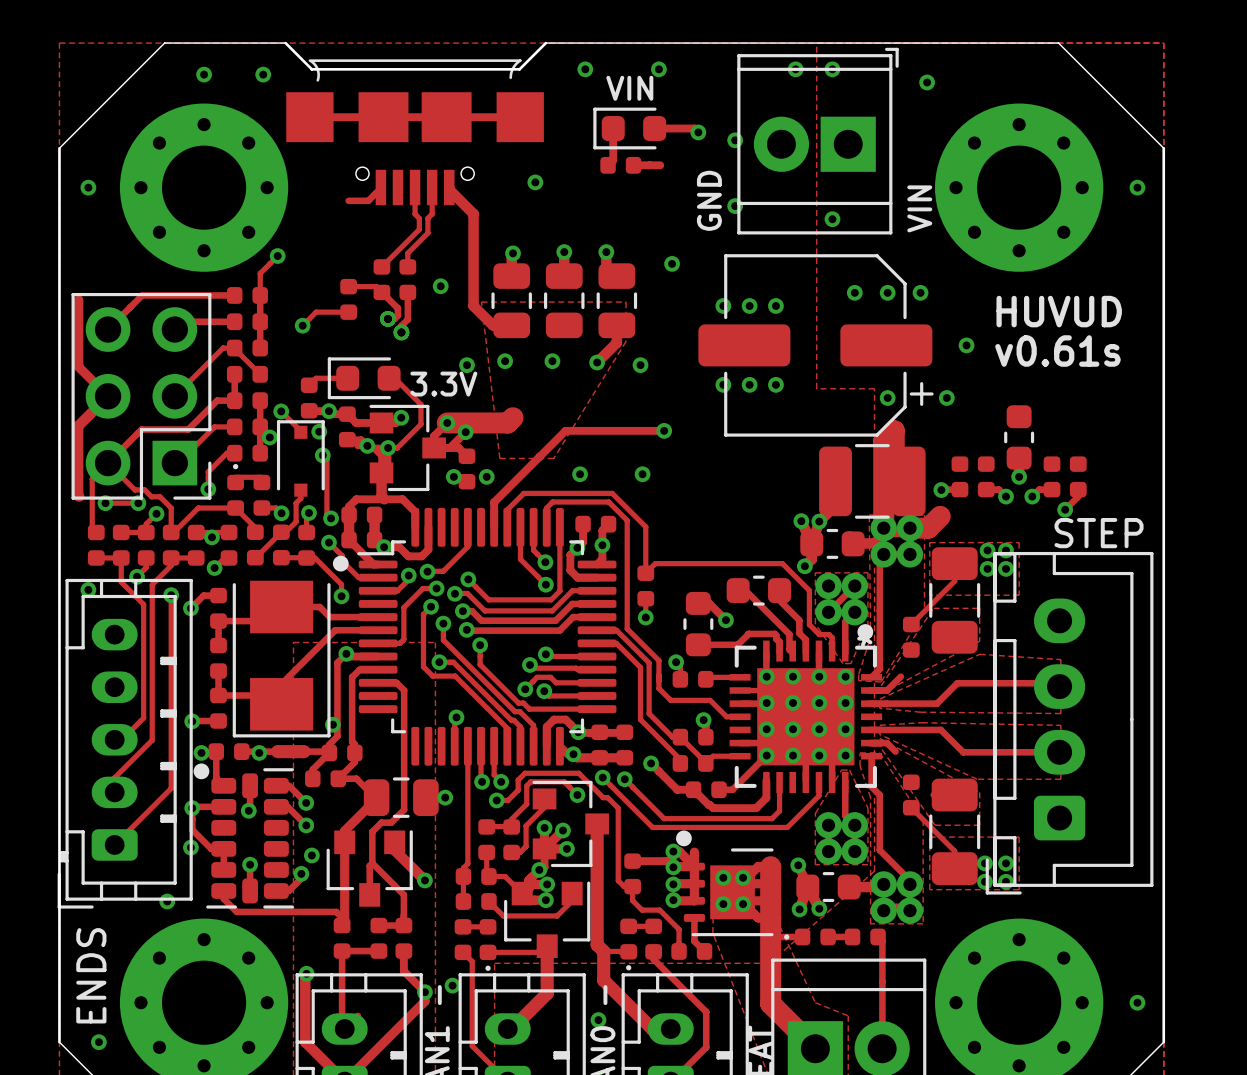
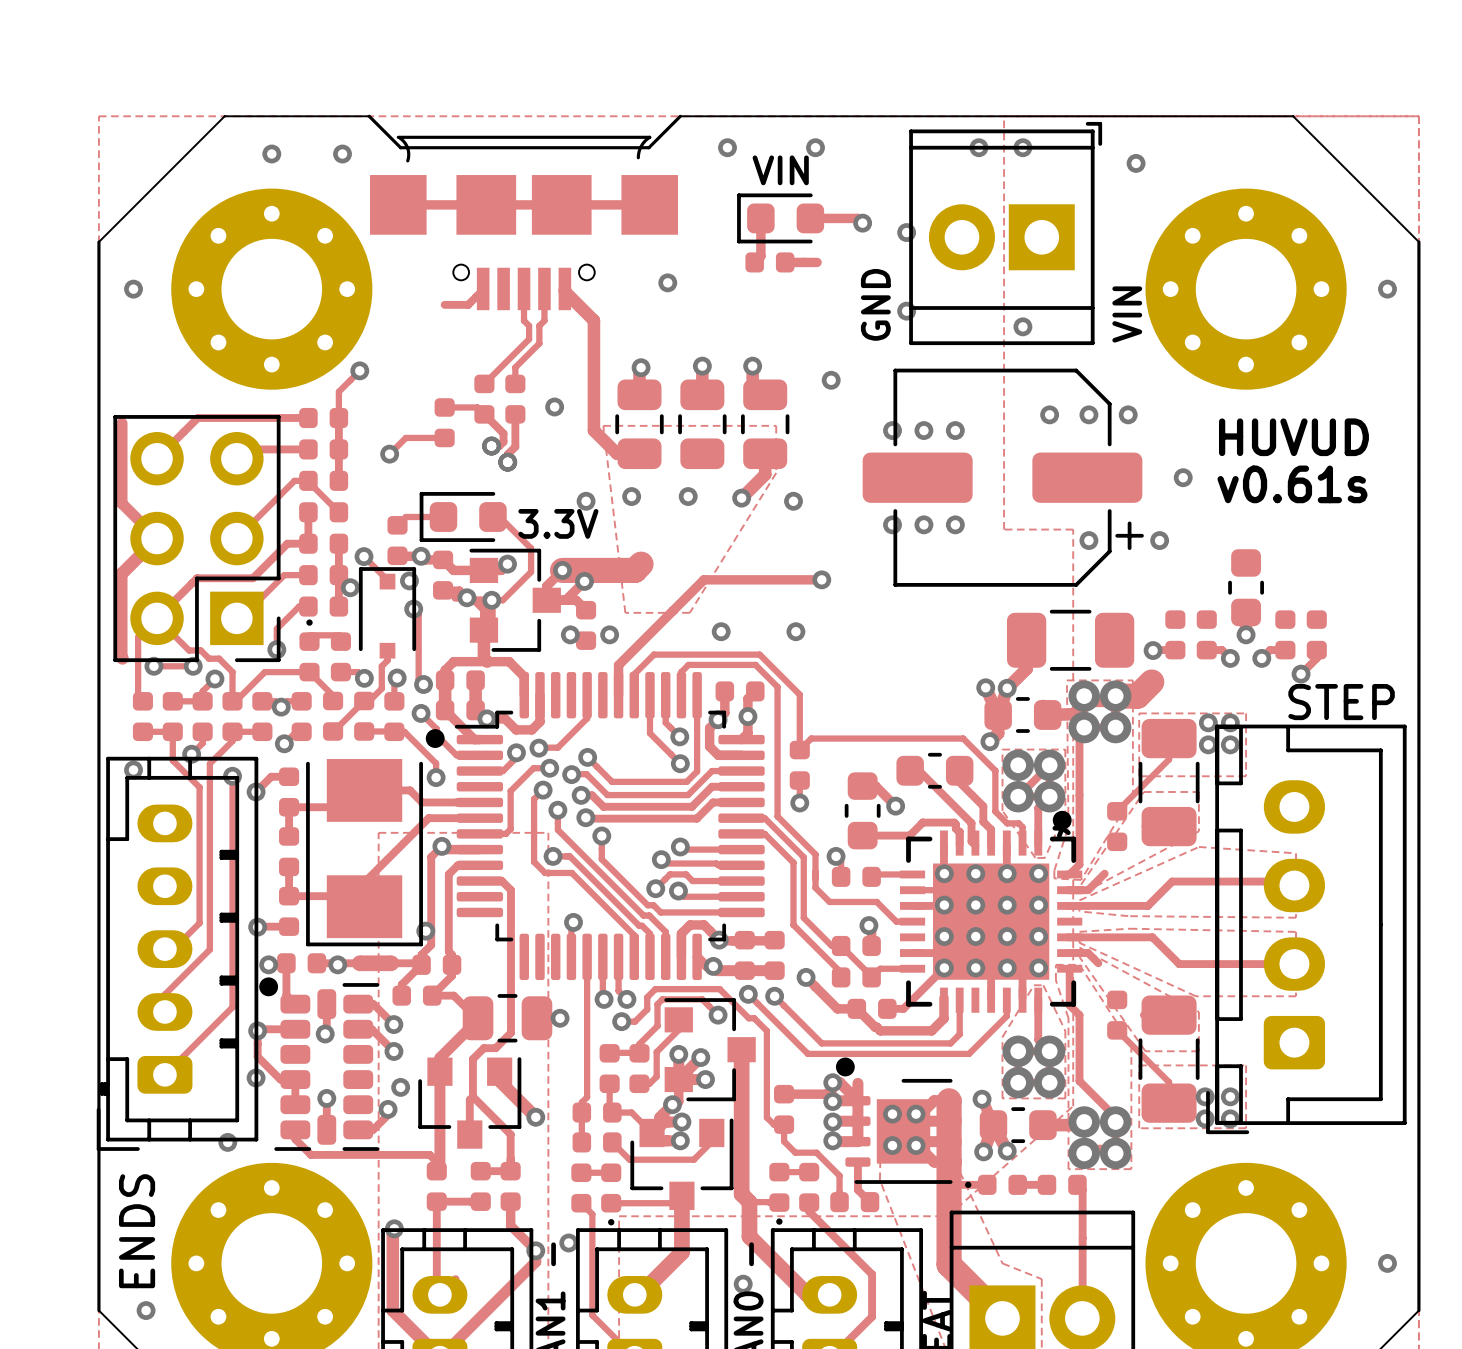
part footprint: [819, 444, 926, 519] -> [1006, 609, 1135, 671]
track: (894, 450) (894, 430) (883, 441) (883, 528) -> none

